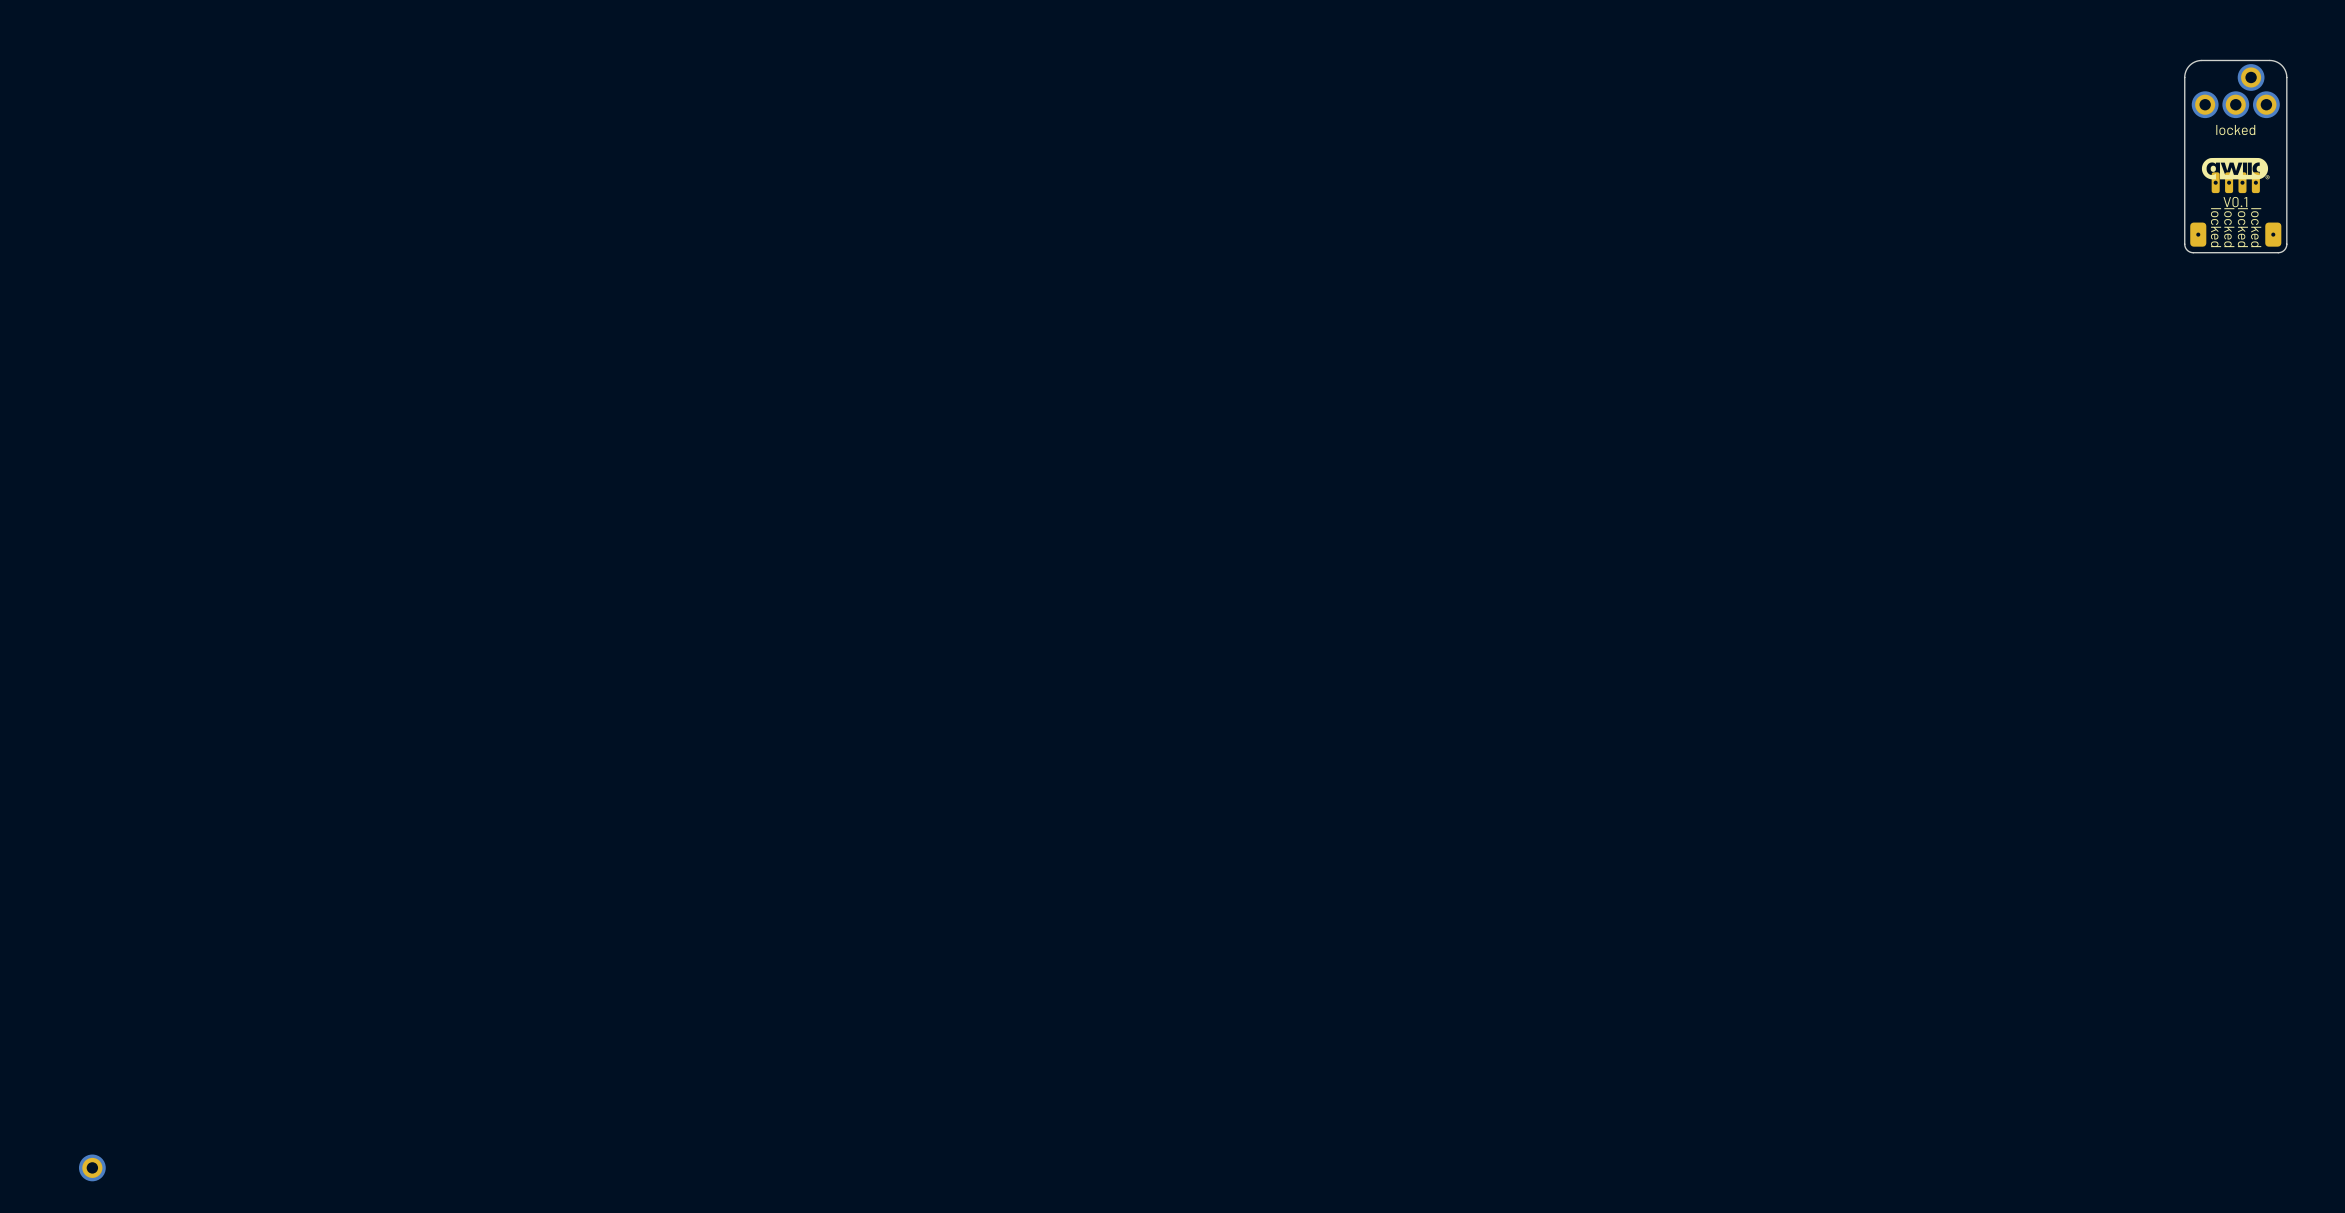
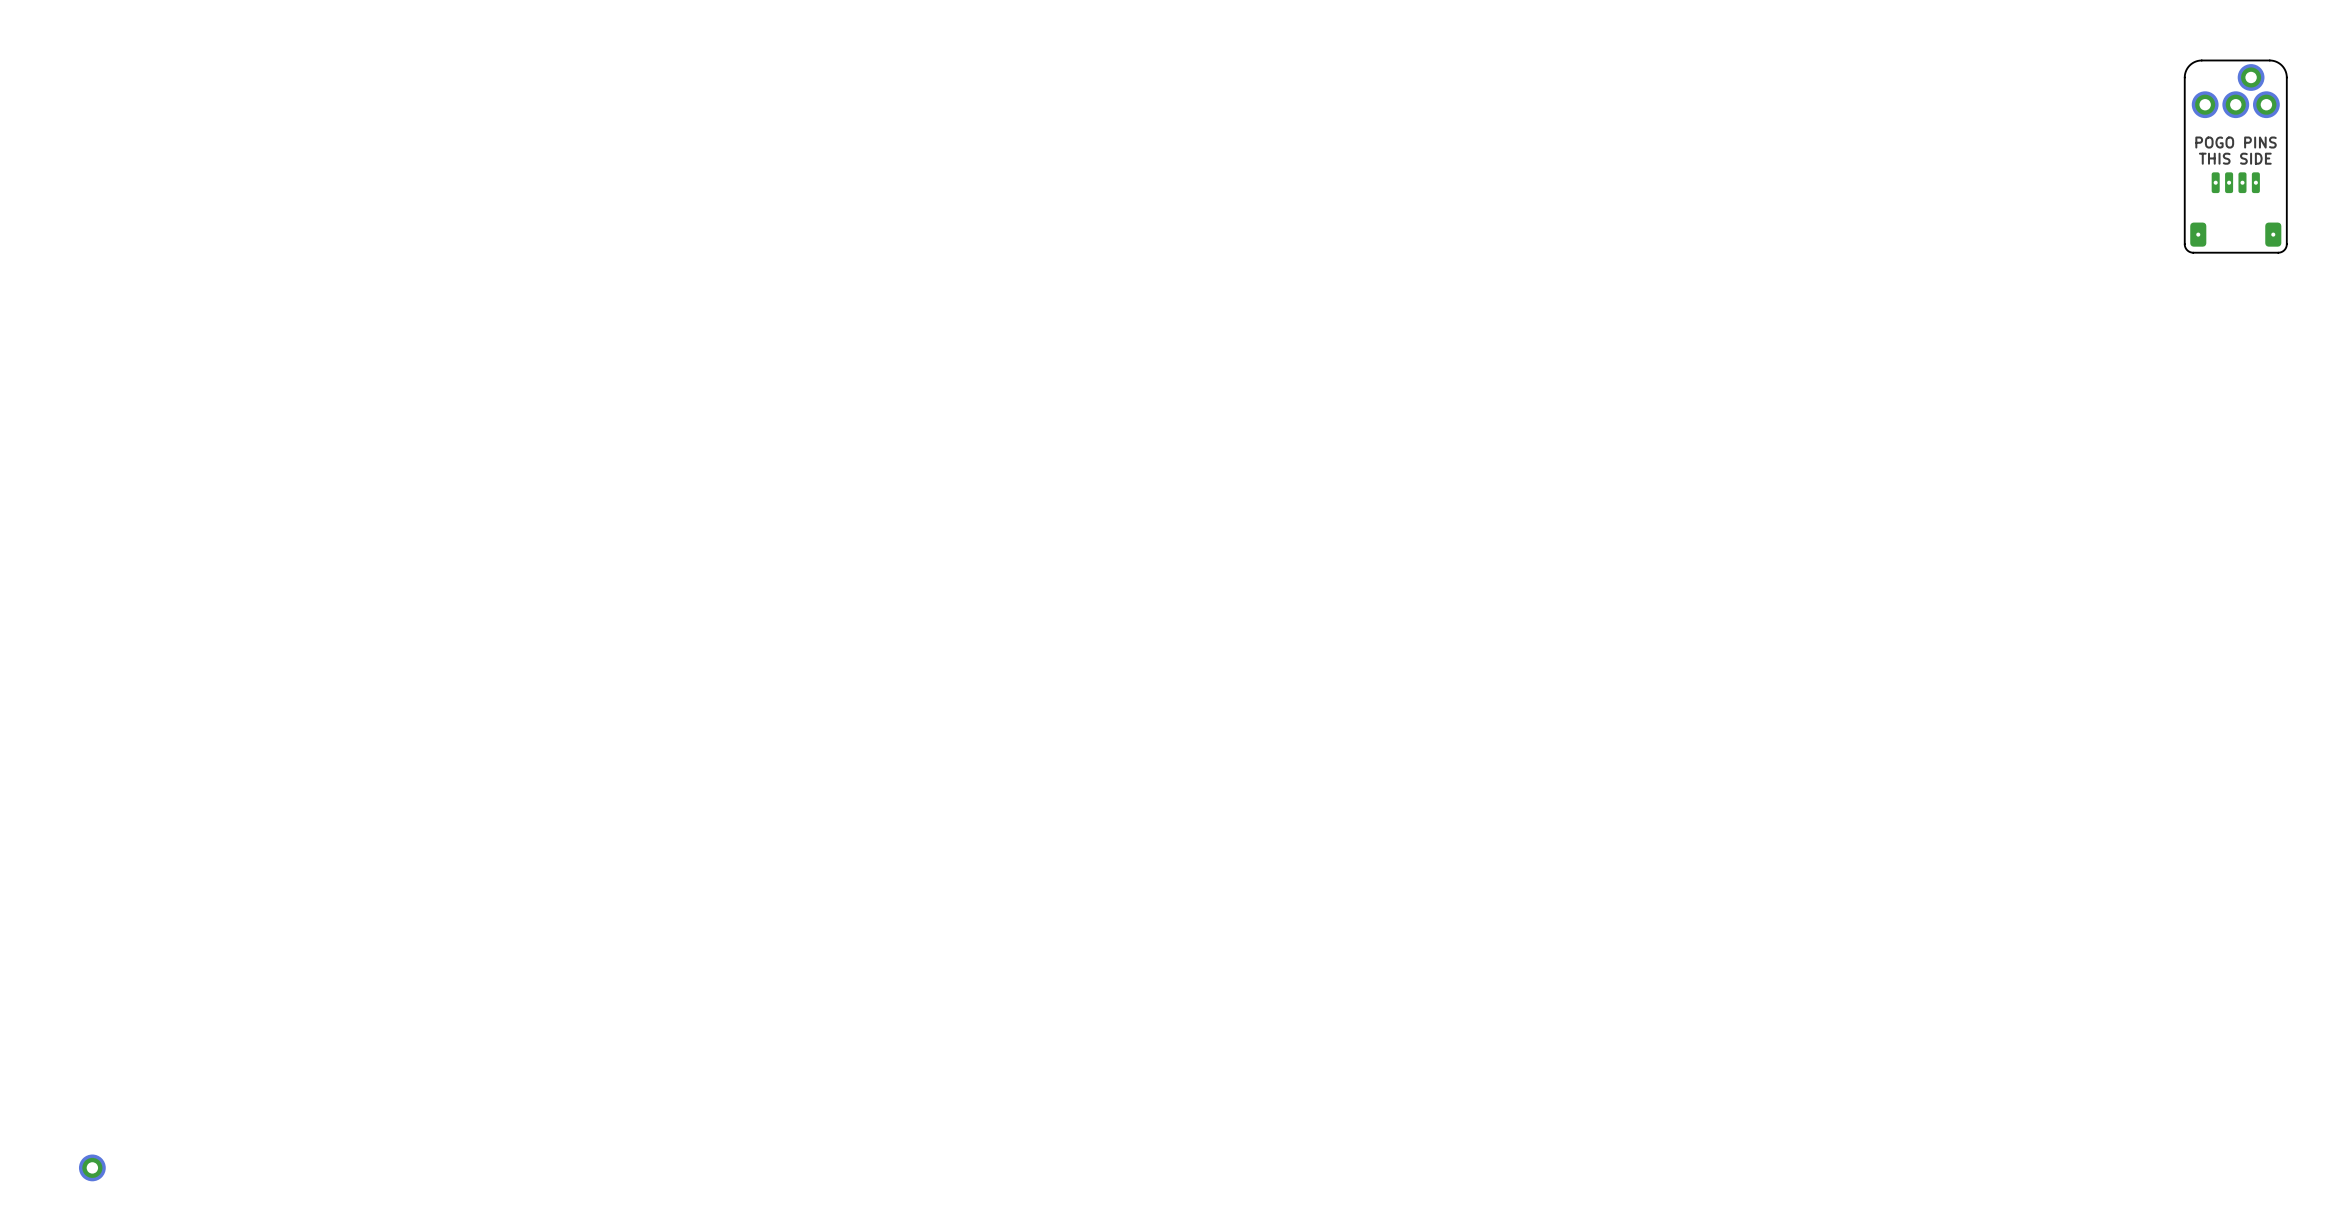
text: locked (2235, 130) -> POGO PINS (2236, 142)
drawing: [2201, 157, 2270, 180] -> none
text: none -> THIS SIDE (2235, 158)
text: V0.1 (2235, 202) -> none
text: locked (2216, 227) -> none
text: locked (2229, 227) -> none
text: locked (2242, 227) -> none
text: locked (2256, 227) -> none

